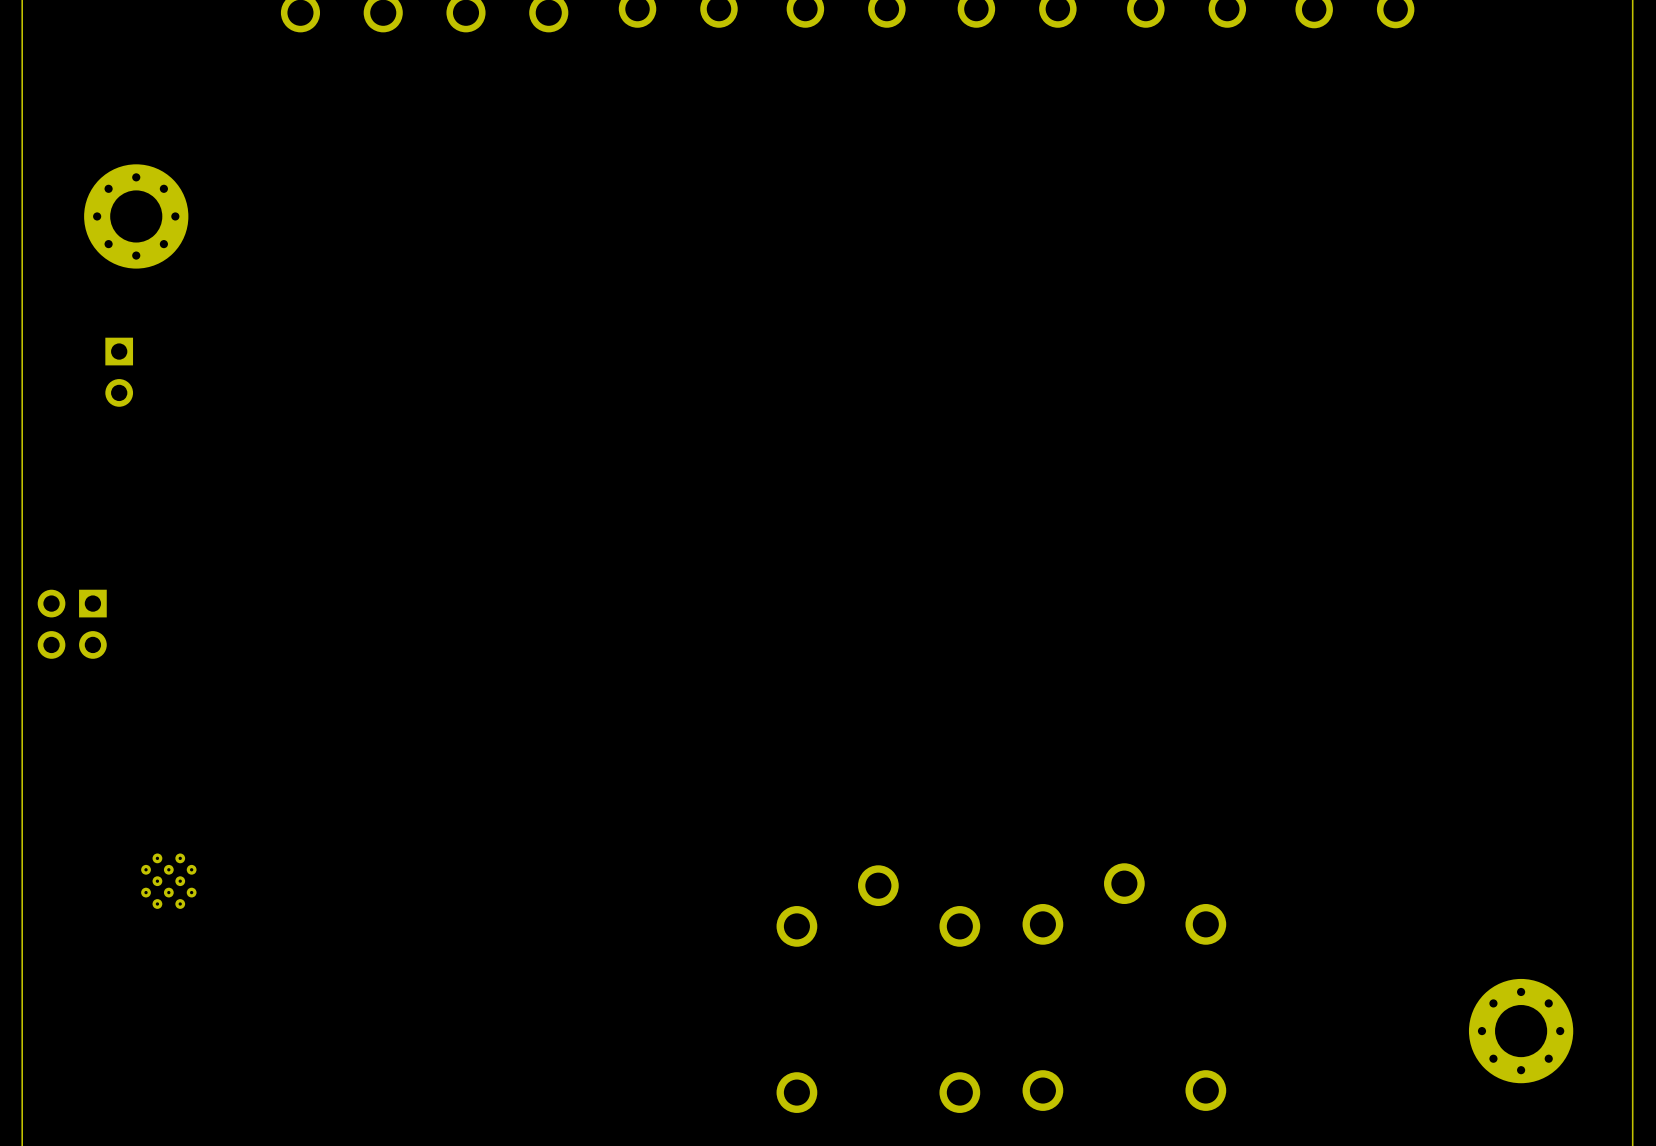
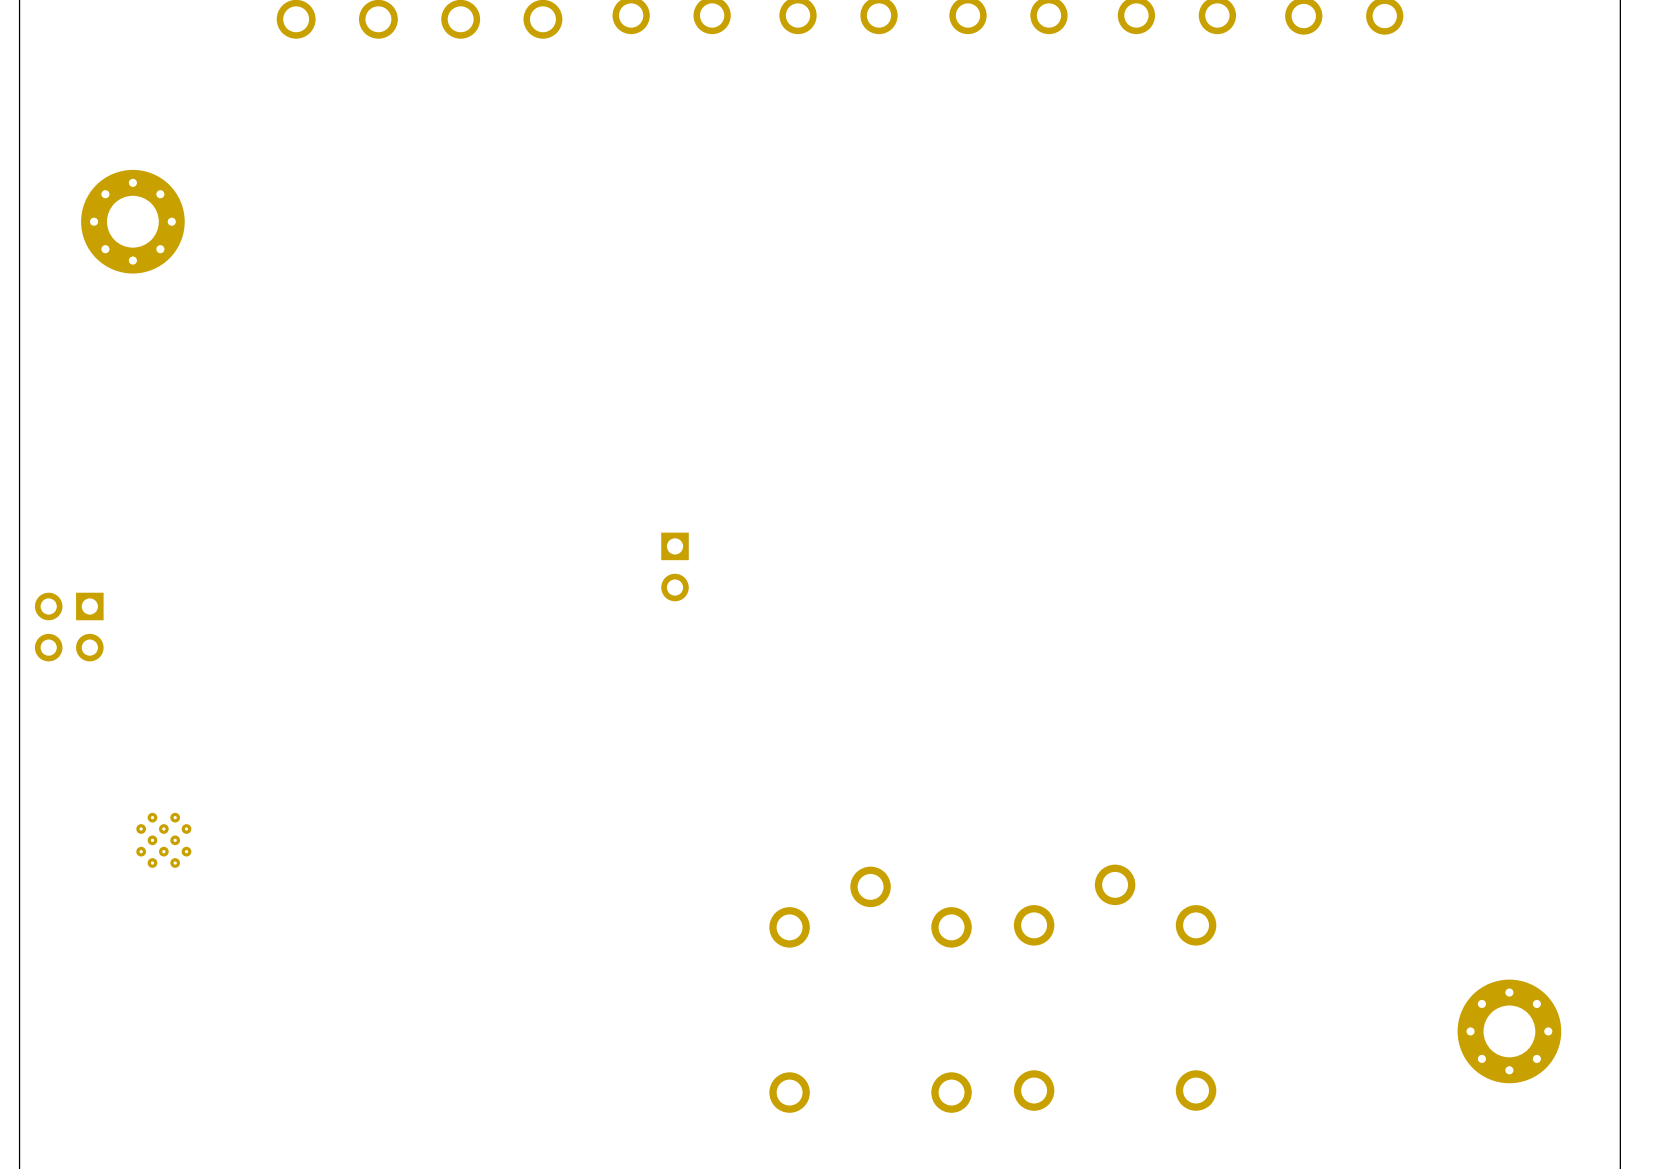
part: (119, 372) -> none
part: none -> (675, 566)
part position: (168, 881) -> (163, 840)

